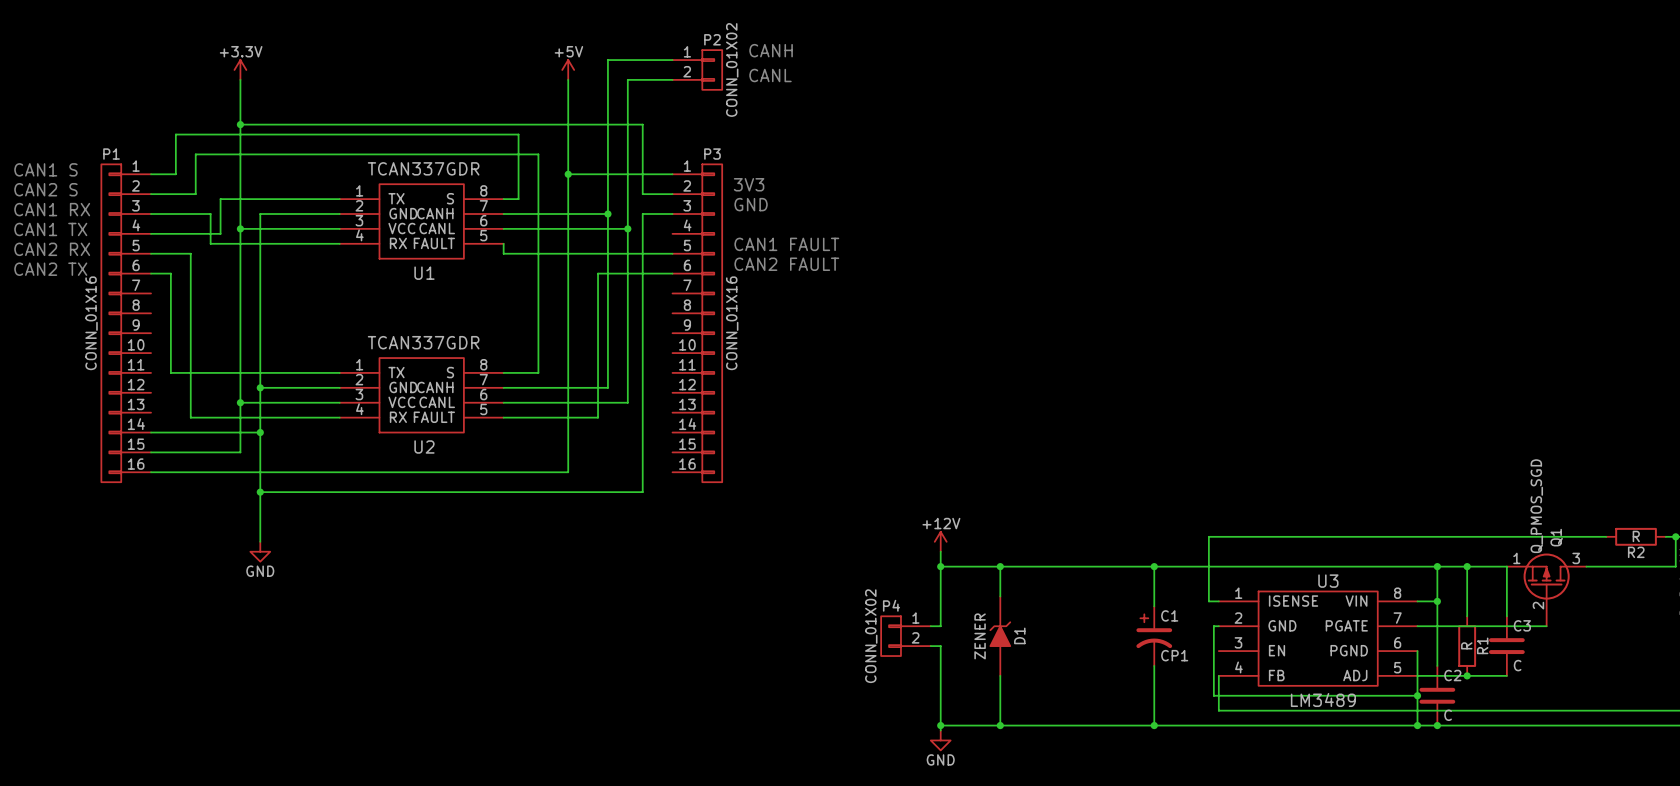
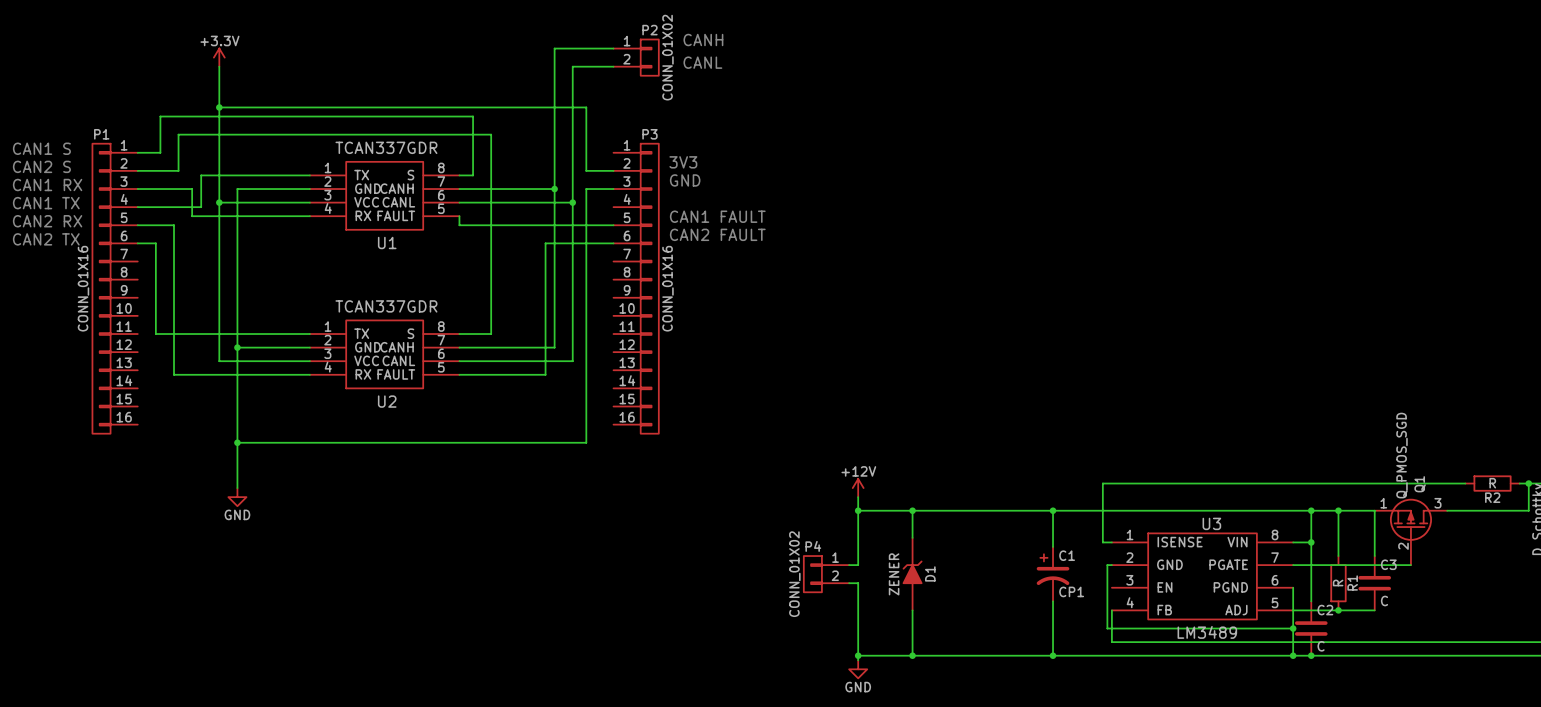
power symbol: +5V (568, 69) -> none
wire: (568, 79) (568, 472) (151, 472) -> none
wire: (568, 174) (672, 174) -> none
junction: (568, 174) -> none
wire: (240, 402) (240, 452) (151, 452) -> none
junction: (240, 402) -> none
wire: (151, 432) (260, 432) -> none
junction: (260, 432) -> none

